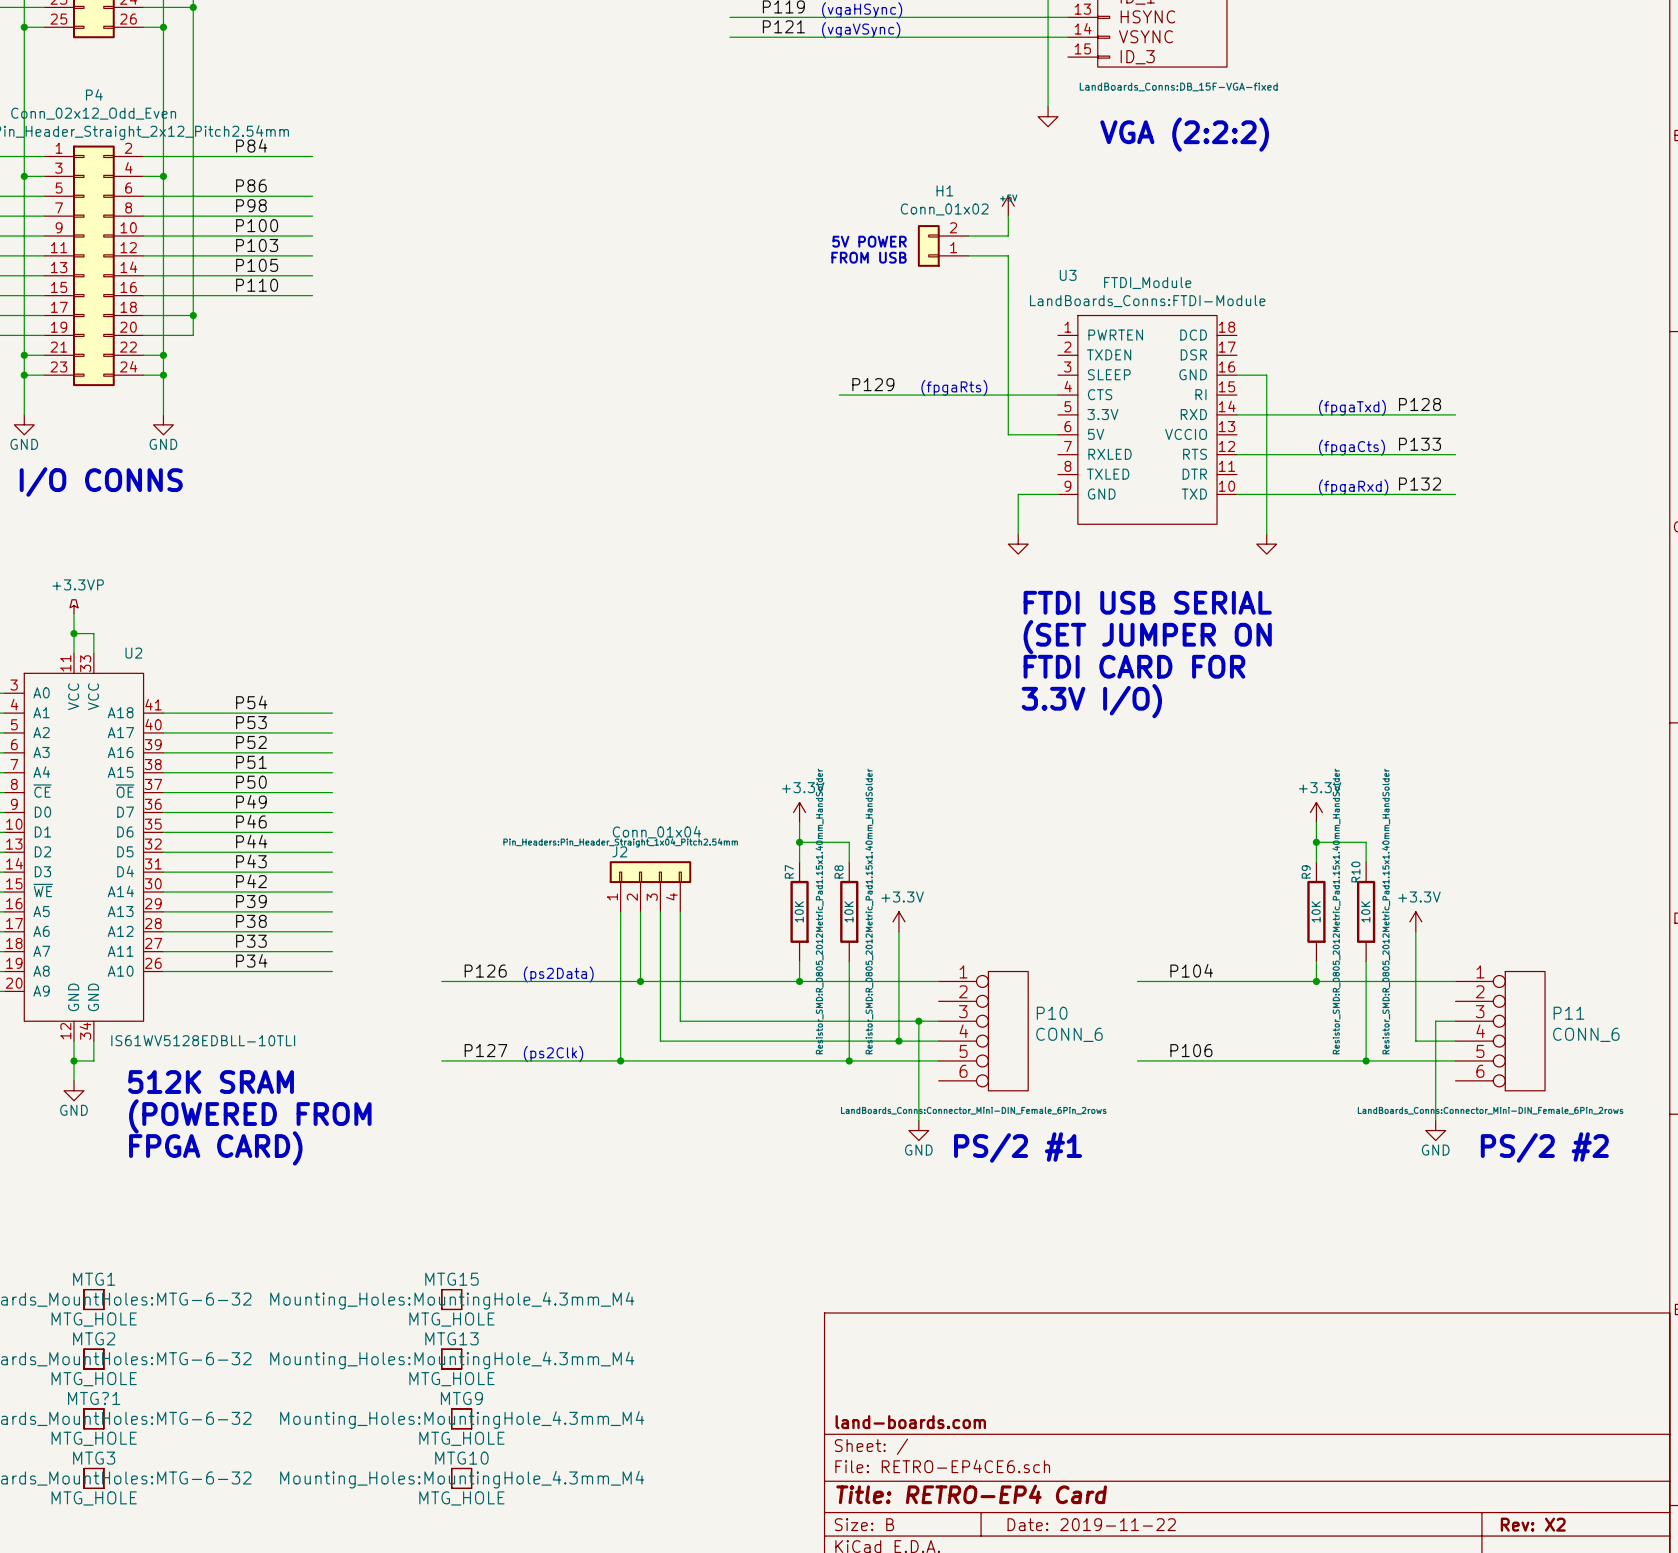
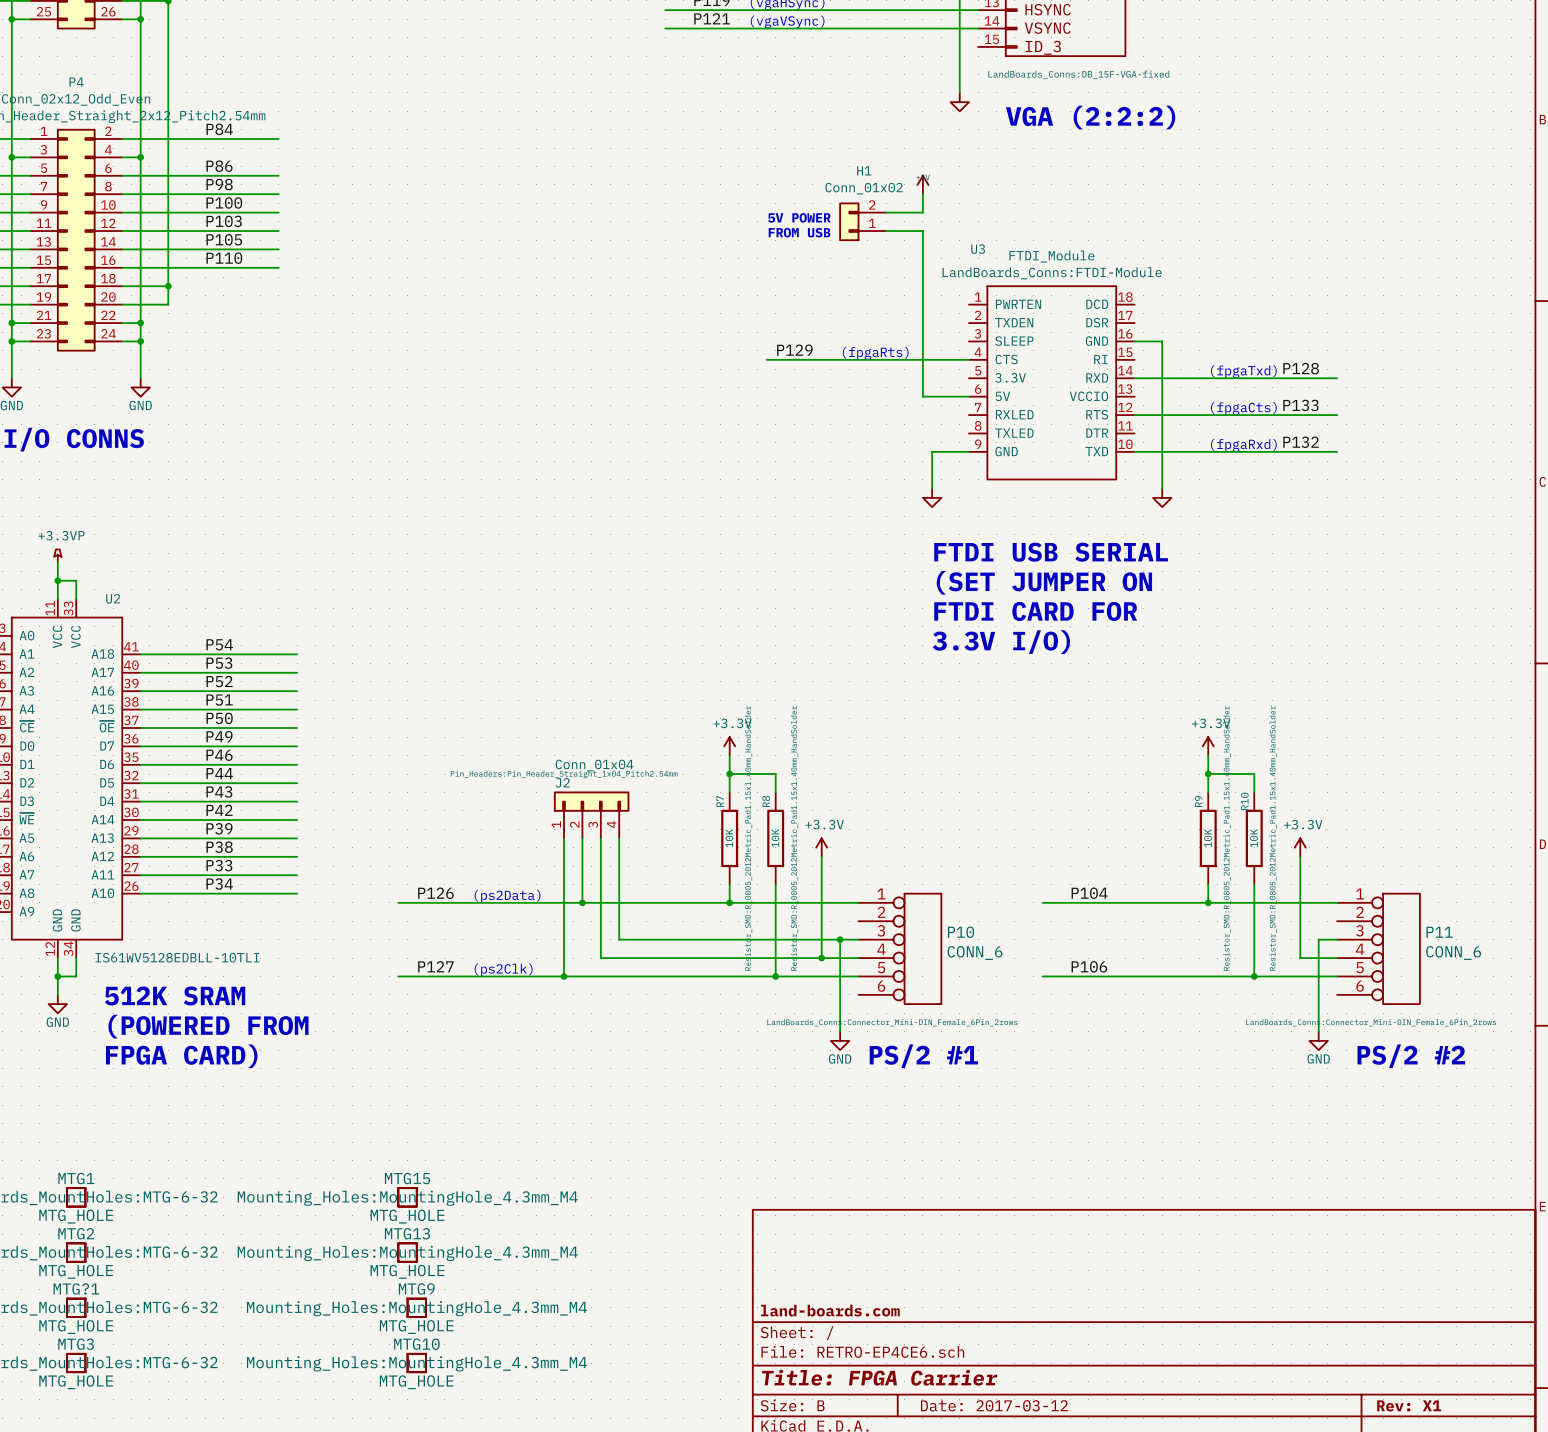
title block: Title: RETRO-EP4 Card (971, 1494) -> Title: FPGA Carrier (879, 1377)
title block: Date: 2019-11-22 (1091, 1524) -> Date: 2017-03-12 (994, 1405)
title block: Rev: X2 (1533, 1524) -> Rev: X1 (1409, 1405)

